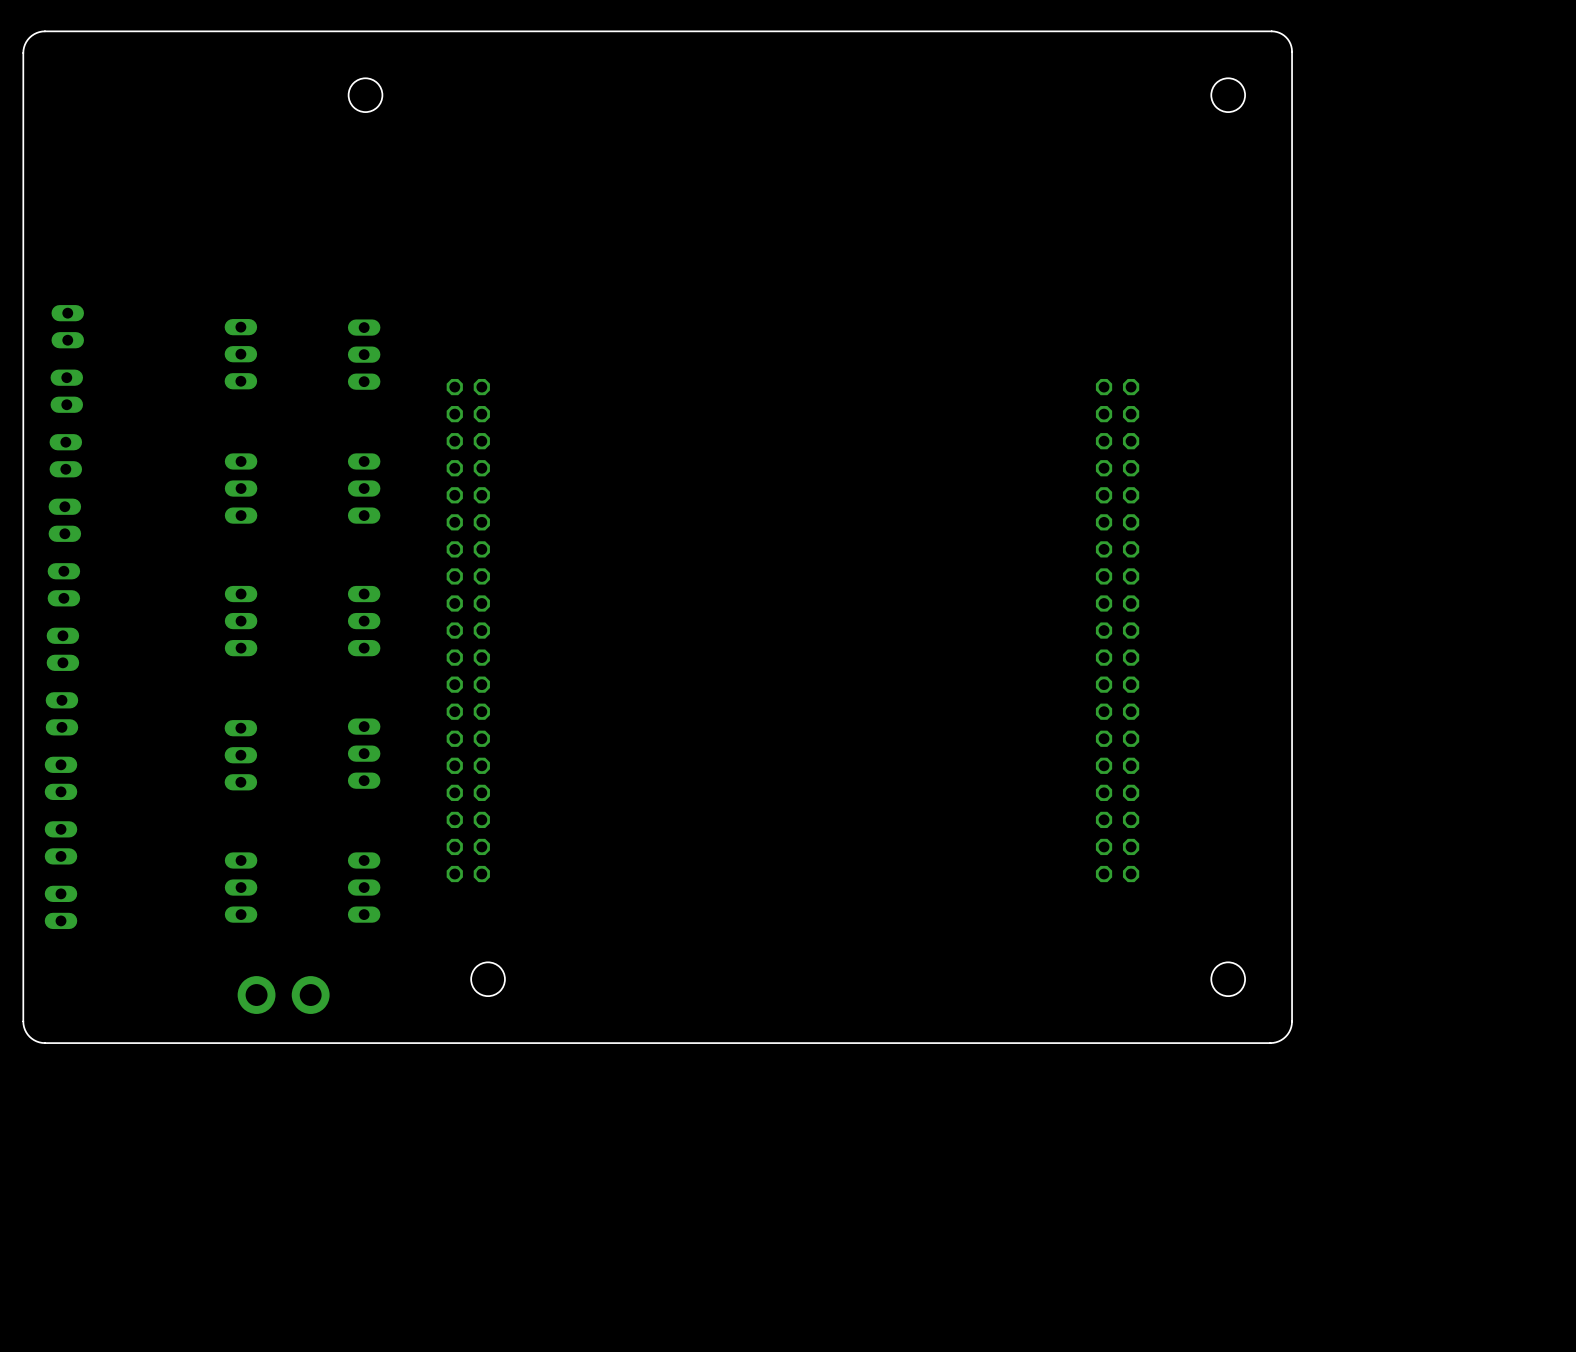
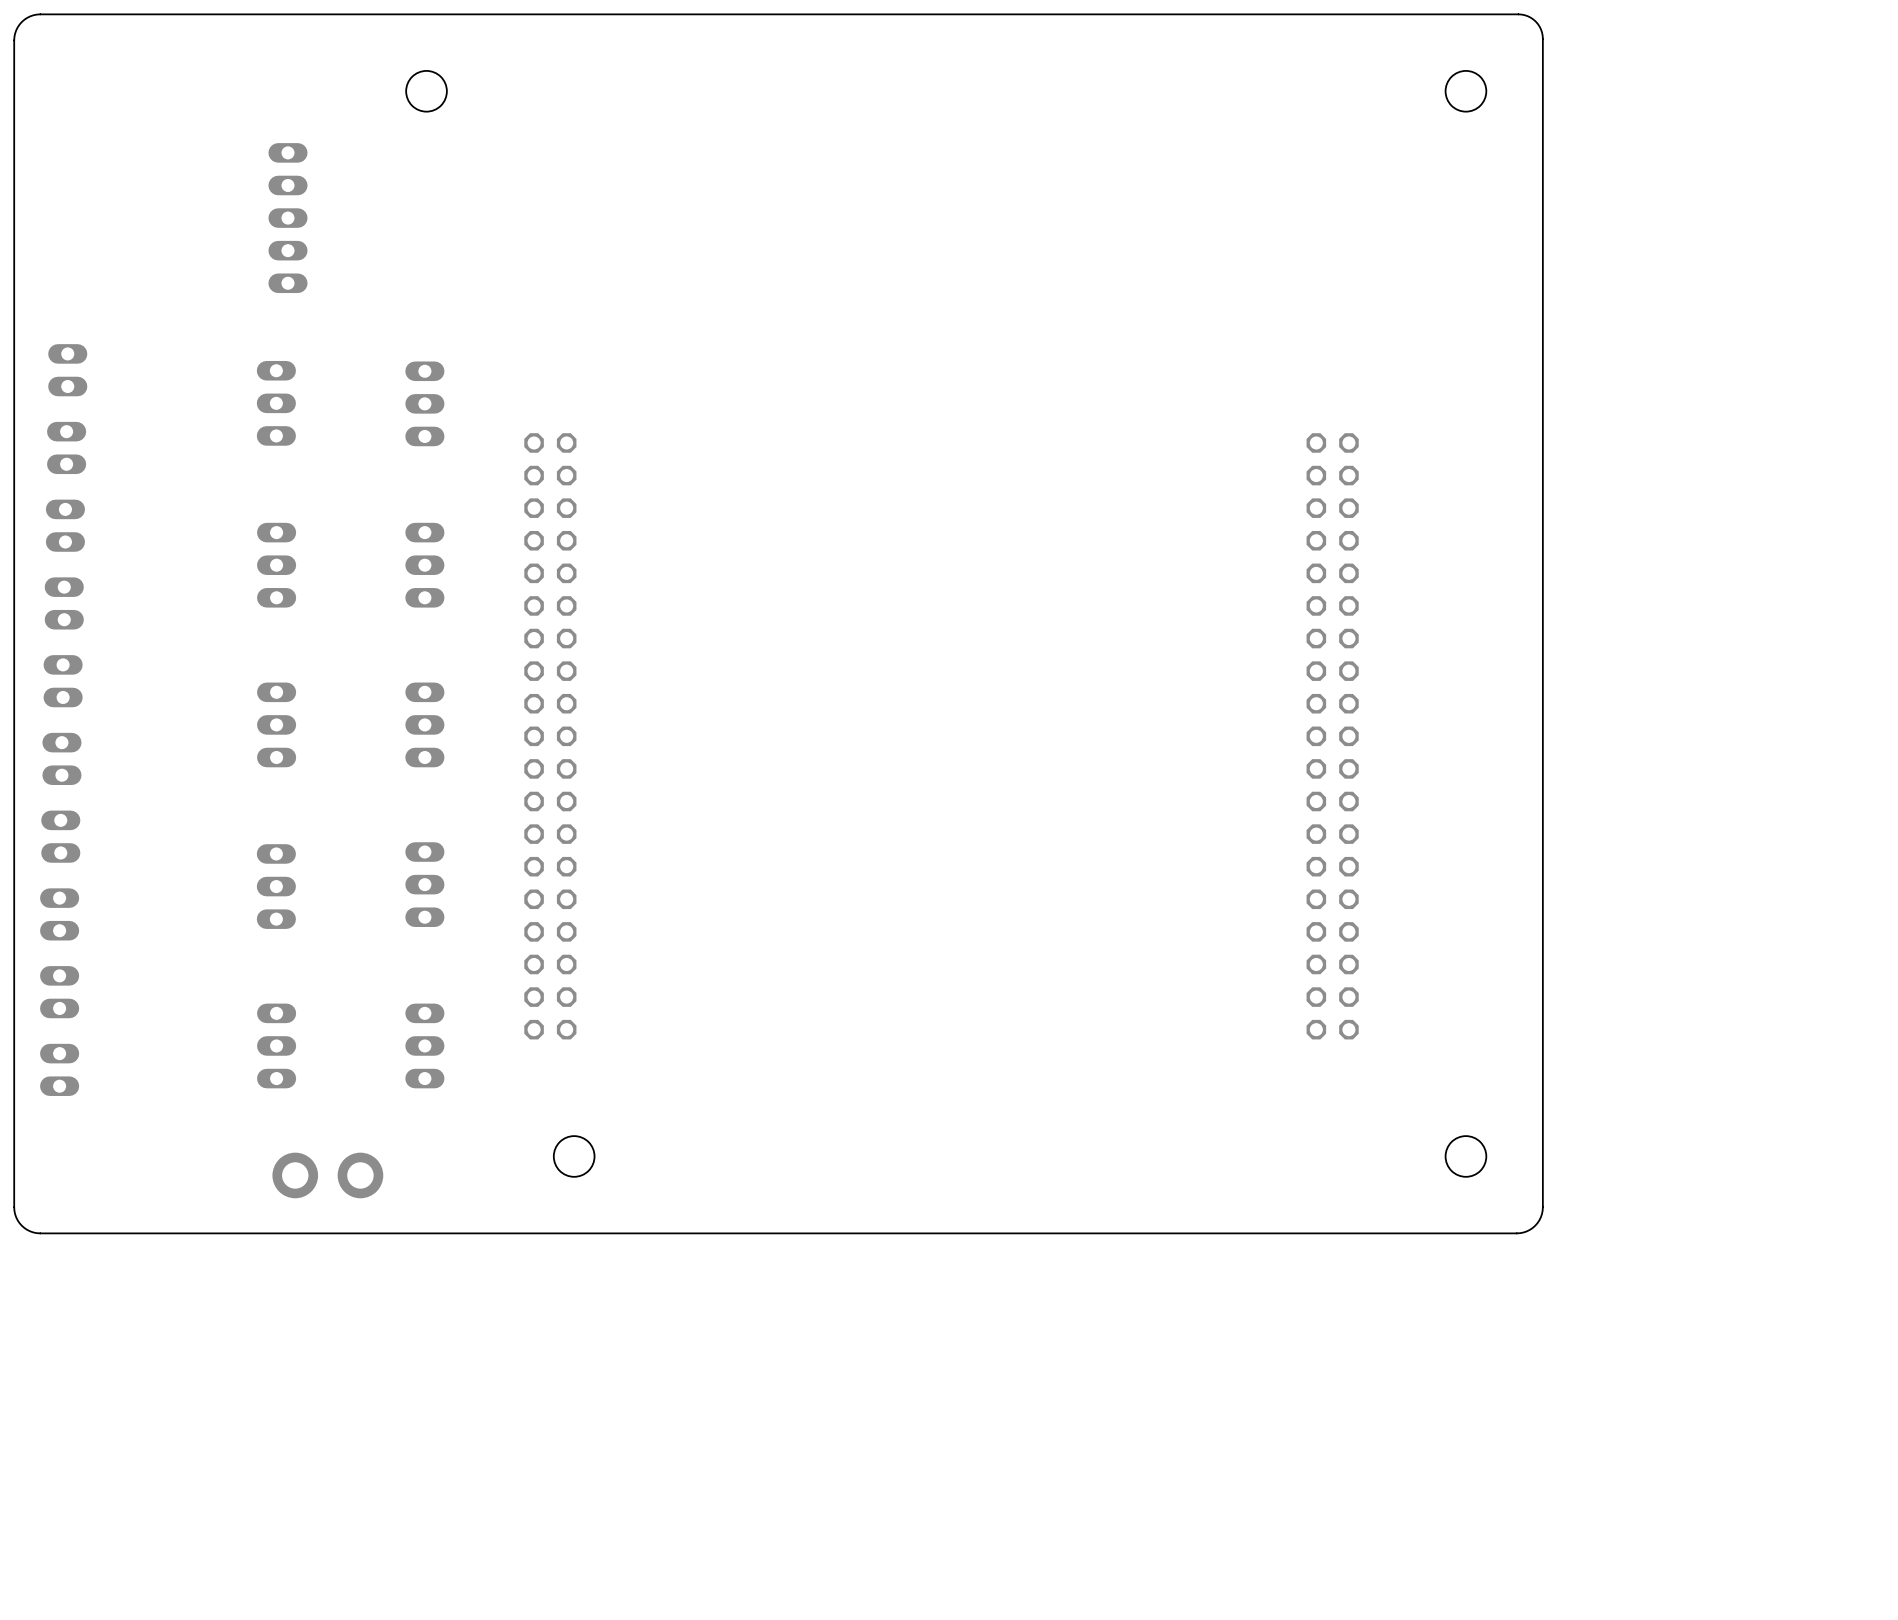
part: none -> (287, 218)

